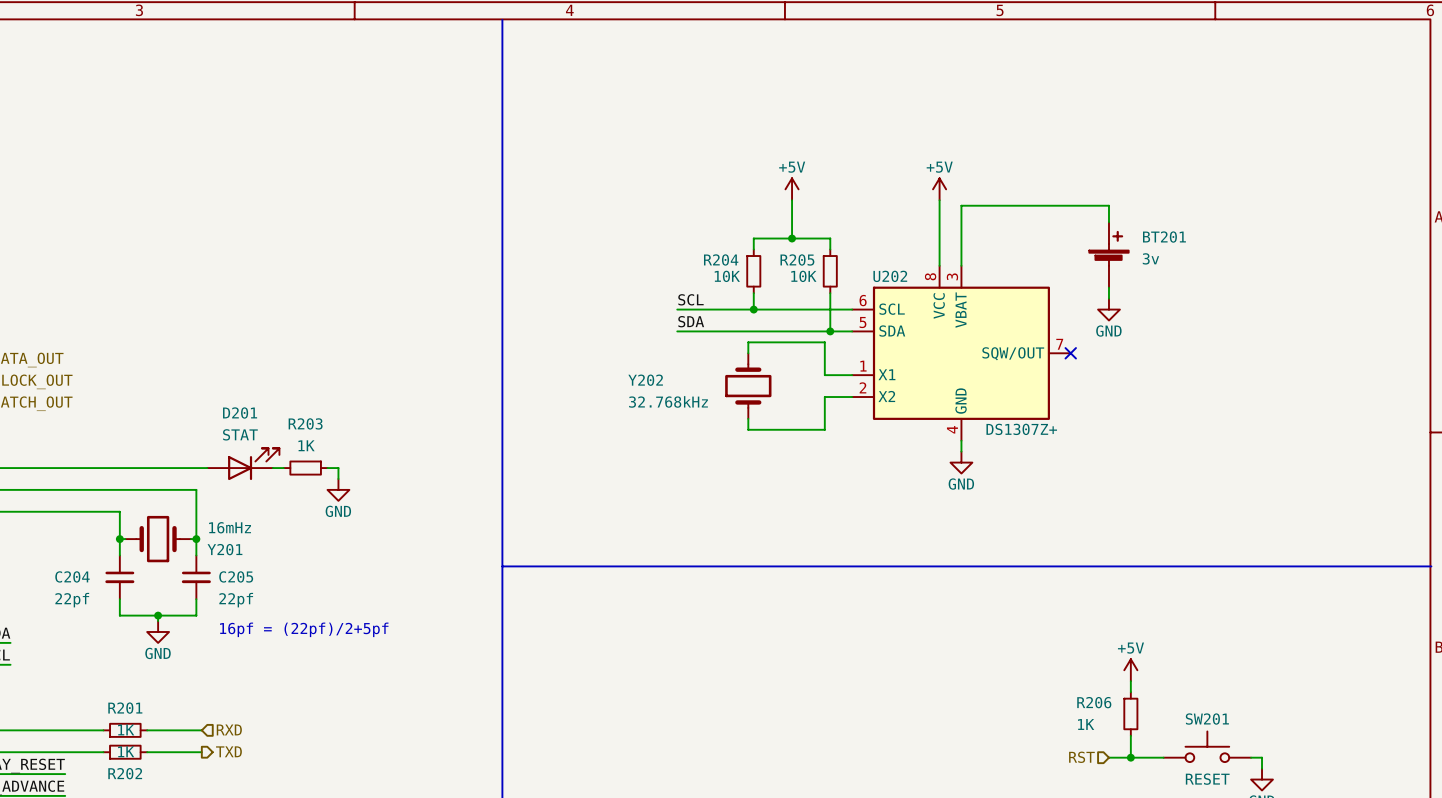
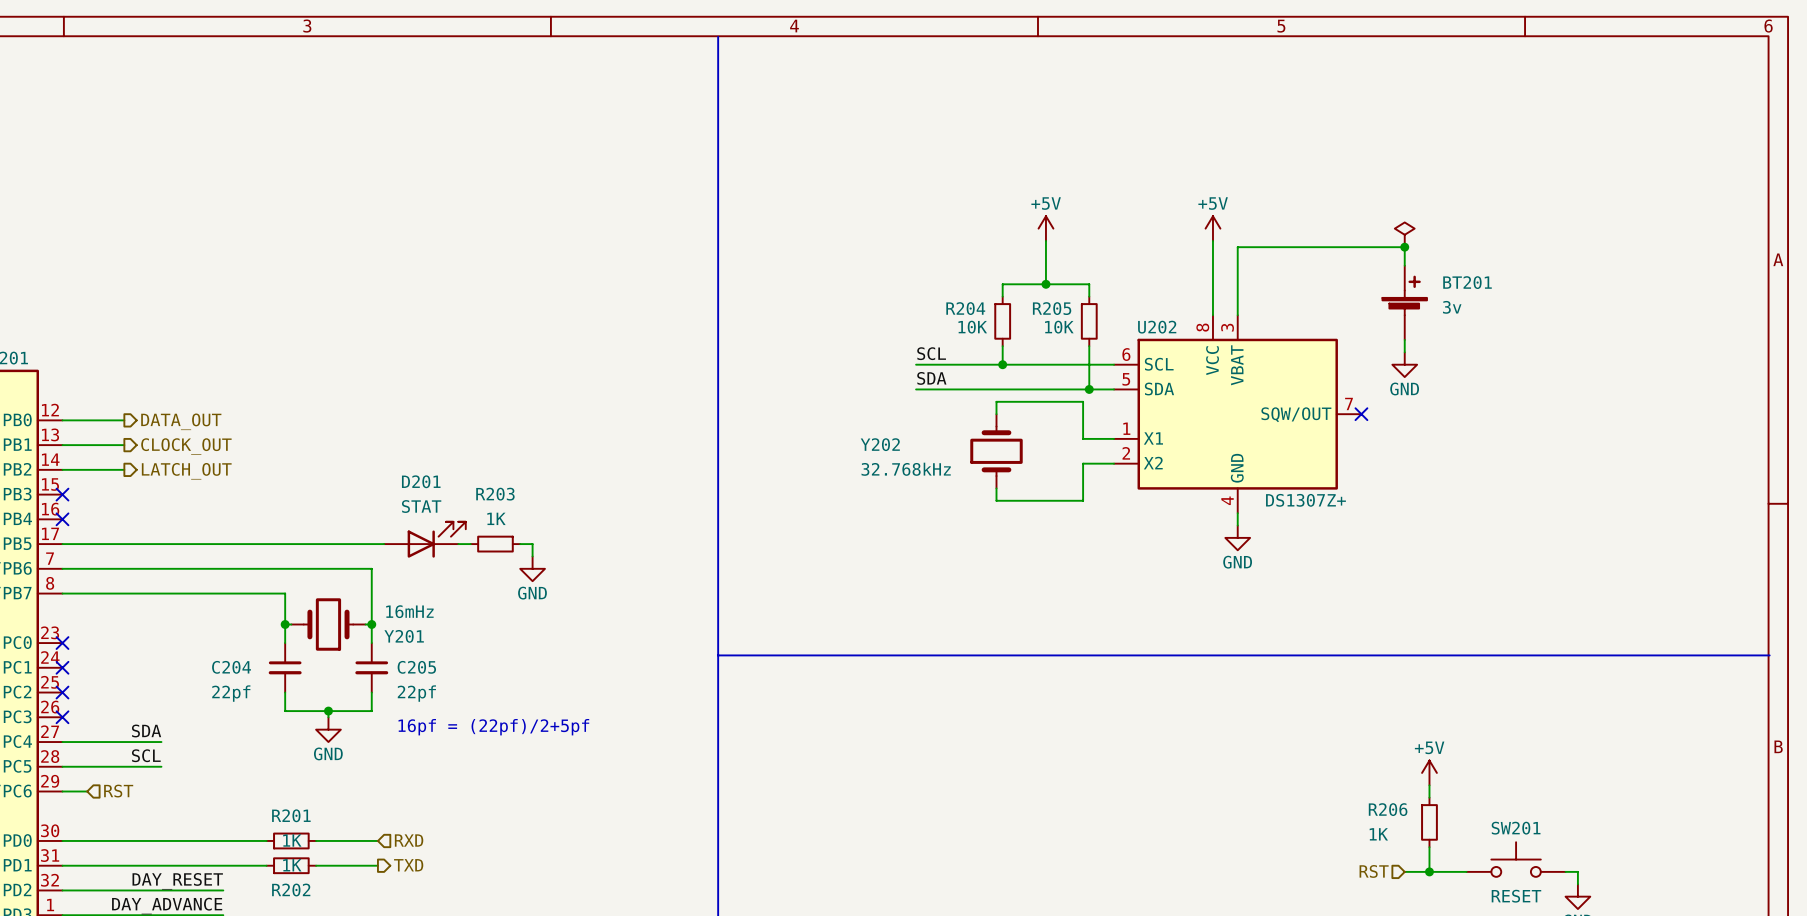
power symbol: none -> (1404, 234)
junction: none -> (1404, 247)

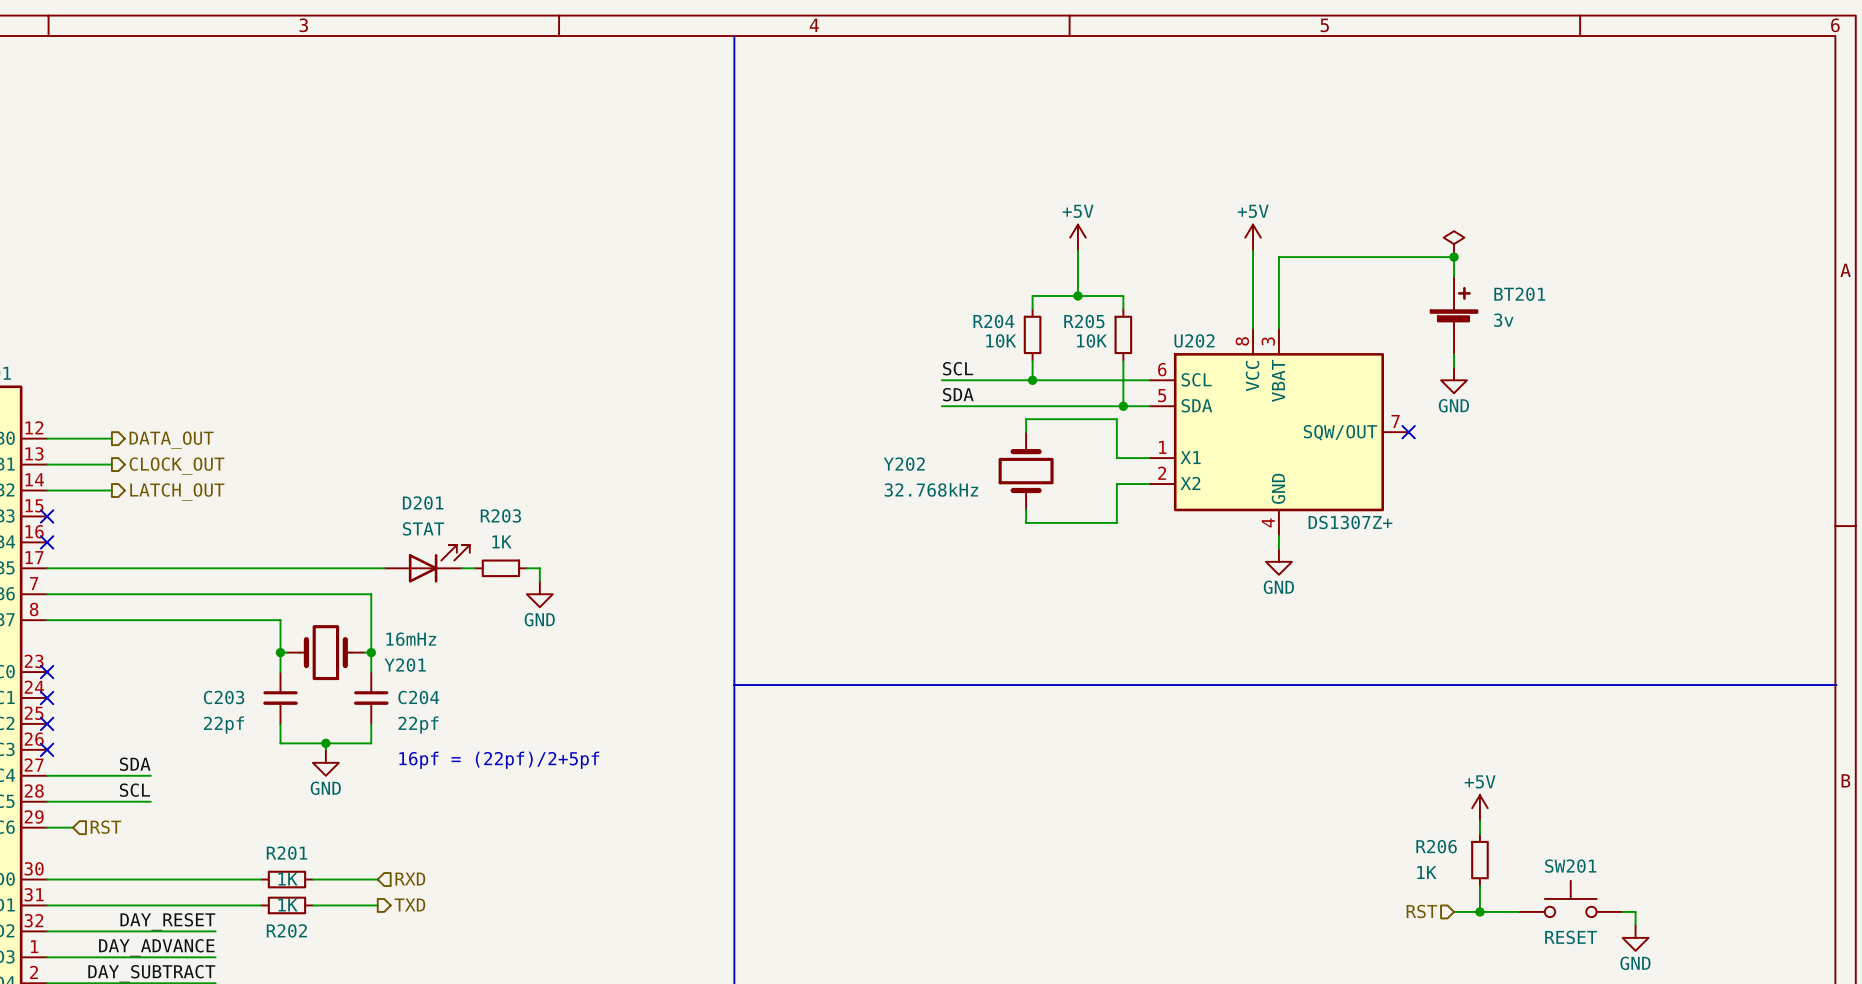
C204 name: C204 (231, 667) -> C203 (224, 697)
C205 name: C205 (416, 667) -> C204 (418, 697)

